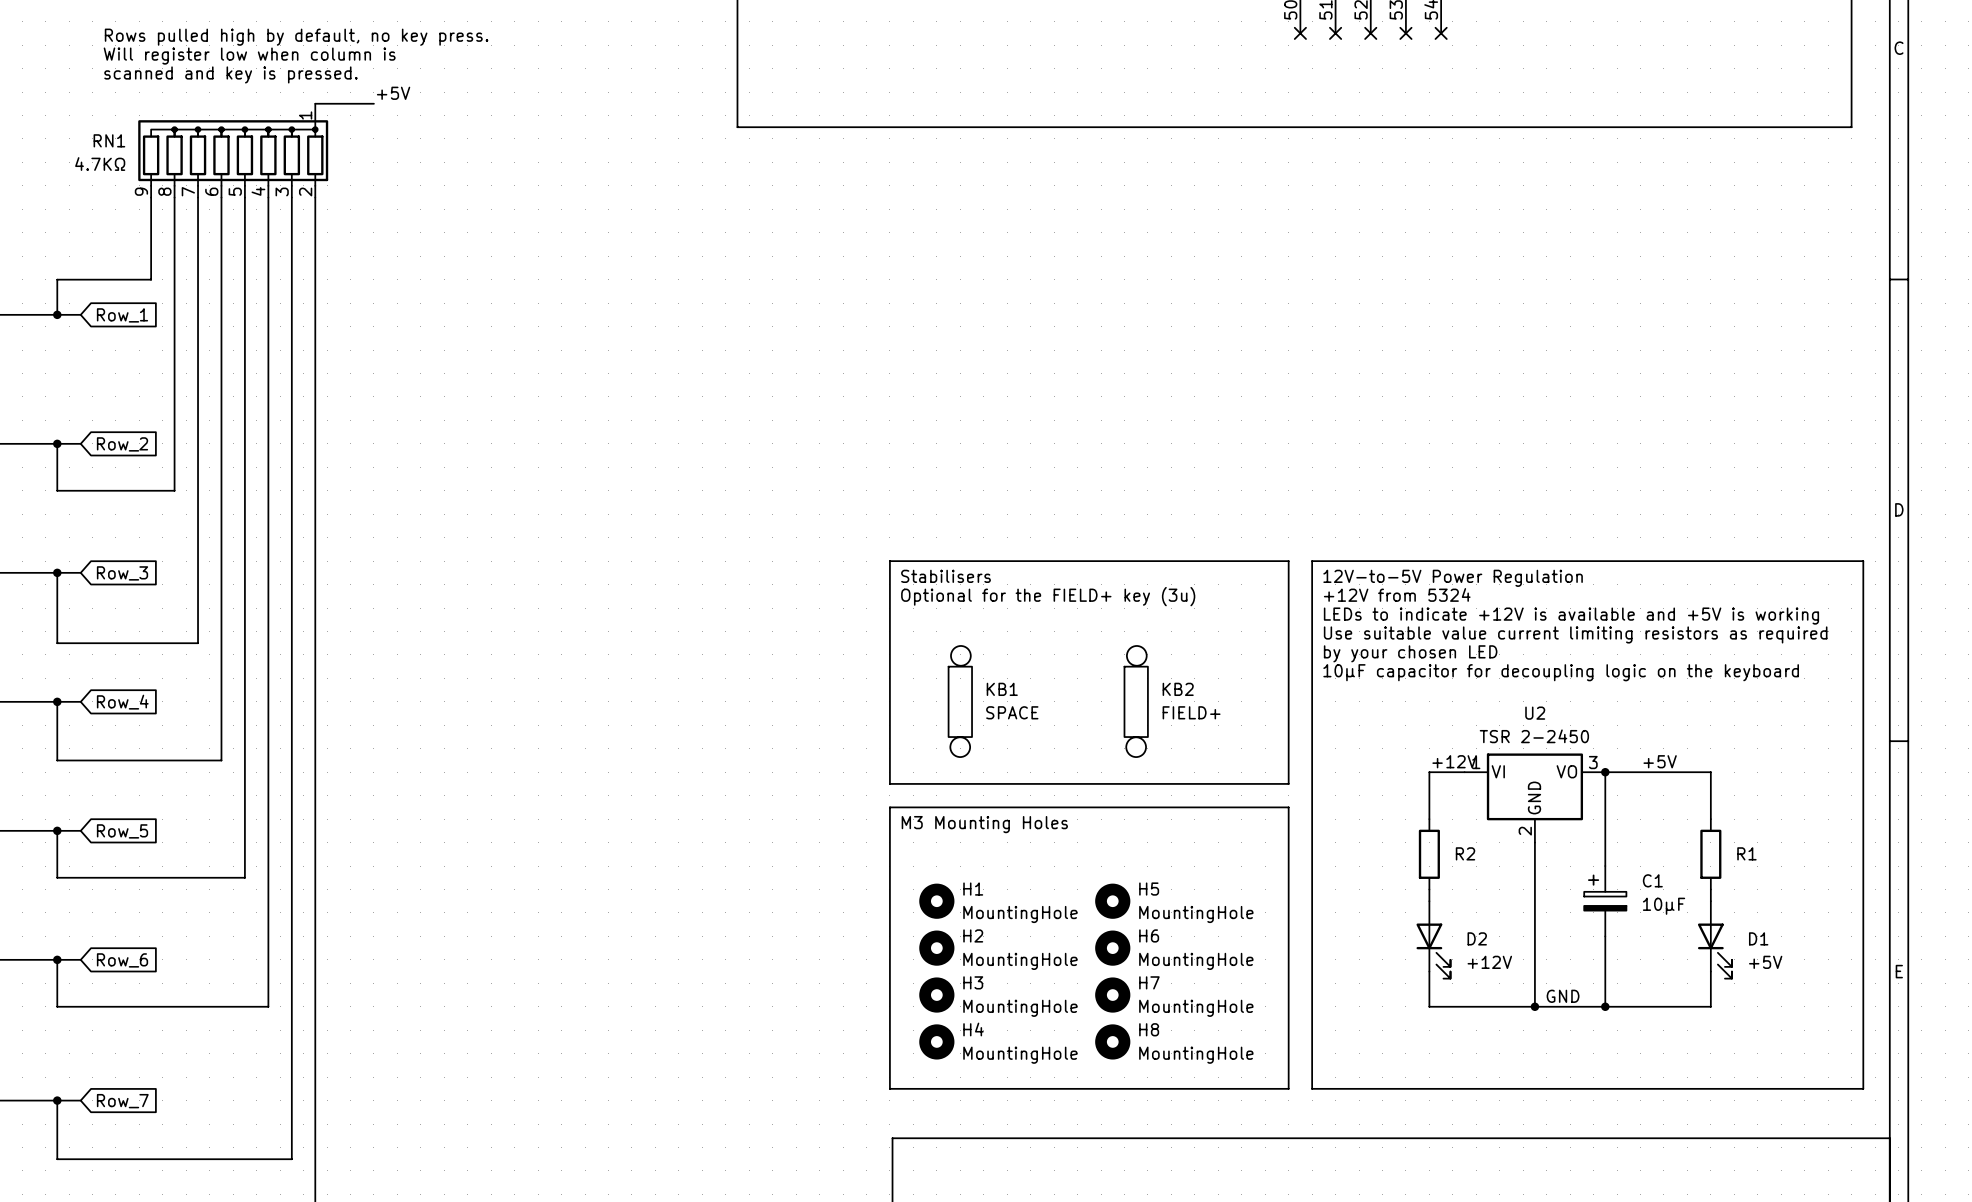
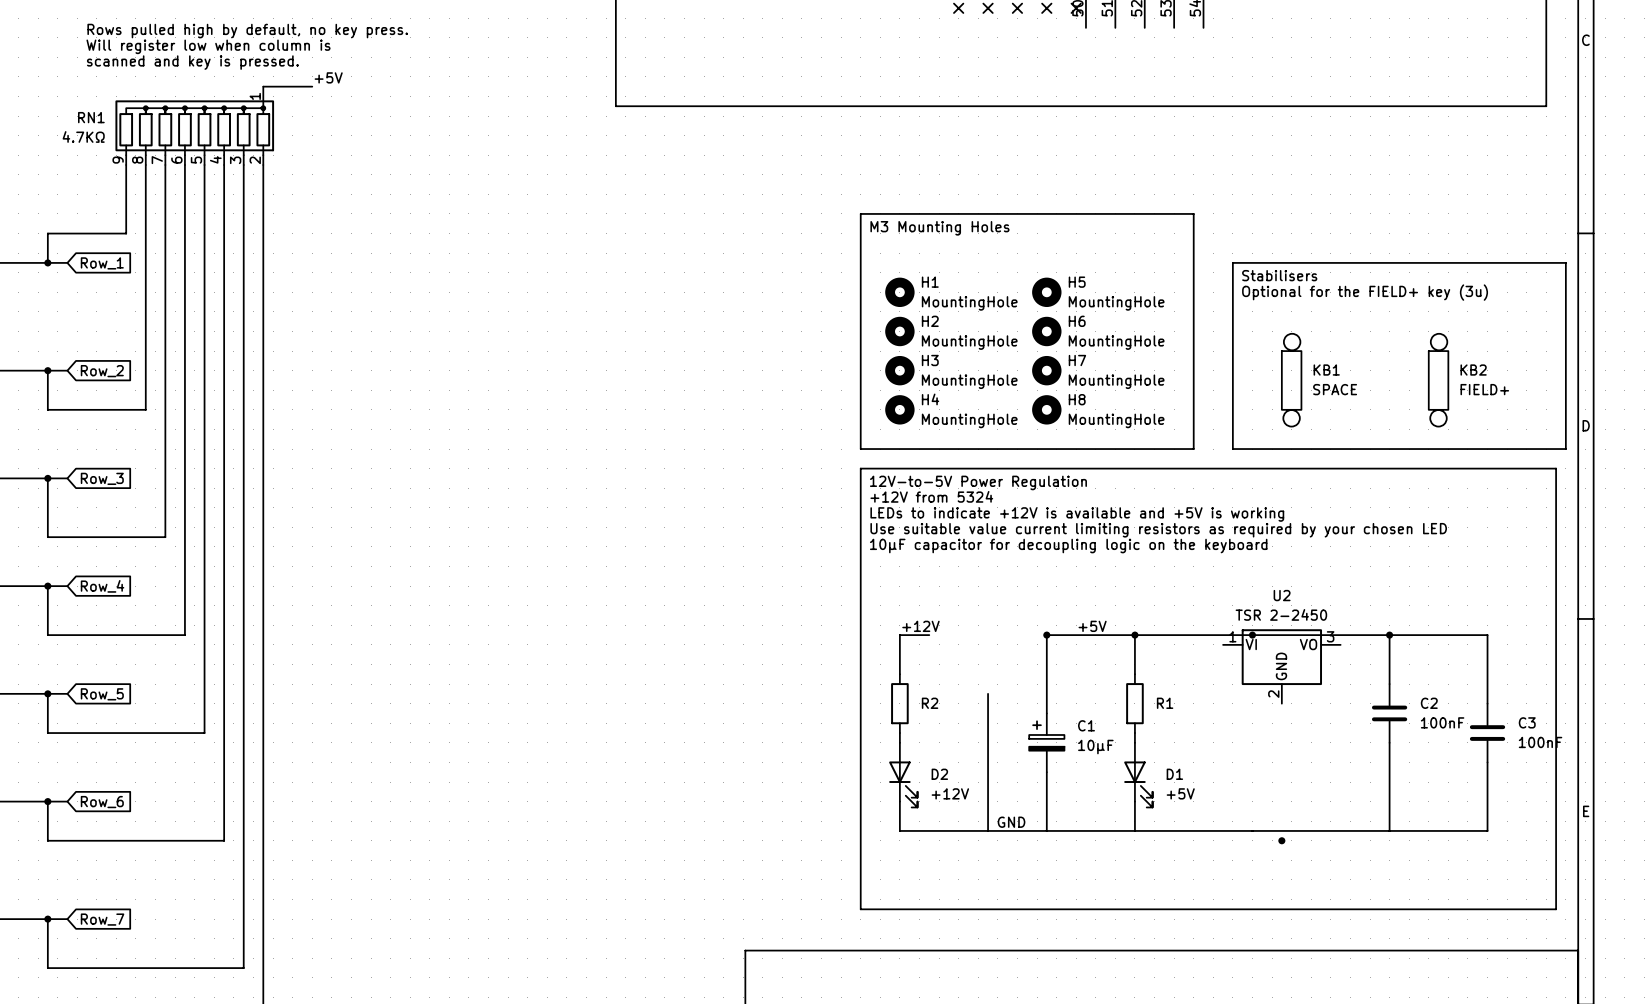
no-connect mark: none -> (958, 8)
no-connect mark: none -> (988, 8)
no-connect mark: none -> (1017, 8)
no-connect mark: none -> (1046, 8)
no-connect mark: none -> (1076, 8)
no-connect mark: (1300, 33) -> none
no-connect mark: (1335, 33) -> none
no-connect mark: (1370, 33) -> none
no-connect mark: (1405, 33) -> none
no-connect mark: (1441, 33) -> none
line: none -> (860, 213) (1193, 213) (1193, 449) (860, 449) (860, 213)
text: none -> M3 Mounting Holes (939, 228)
line: none -> (1232, 262) (1565, 262) (1565, 449) (1232, 449) (1232, 262)
text: none -> Stabilisers (1279, 275)
text: none -> Optional for the FIELD+ key (3u) (1365, 292)
line: (1030, 561) (889, 561) (889, 783) (1288, 783) (1288, 561) -> (1095, 468) (1076, 468)
line: none -> (860, 468) (860, 909)
line: (1312, 561) (1312, 1088) -> none
text: Stabilisers (946, 576) -> none
text: none -> 12V-to-5V Power Regulation (978, 482)
text: 12V-to-5V Power Regulation (1453, 578) -> none
text: none -> +12V from 5324 (931, 496)
text: +12V from 5324 (1397, 594) -> none
text: Optional for the FIELD+ key (3u) (1048, 596) -> none
text: none -> LEDs to indicate +12V is available and +5V is working (1077, 514)
text: LEDs to indicate +12V is available and +5V is working (1571, 616) -> none
text: none -> Use suitable value current limiting resistors as required by your chosen LED (1158, 530)
text: Use suitable value current limiting resistors as required (1575, 634) -> none
text: none -> 10µF capacitor for decoupling logic on the keyboard (1068, 546)
text: by your chosen LED (1410, 653) -> none
text: 10µF capacitor for decoupling logic on the keyboard (1561, 672) -> none
KB1 position: (960, 701) -> (1291, 380)
KB2 position: (1136, 701) -> (1438, 380)
label: none -> +12V (920, 626)
label: none -> +5V (1092, 626)
wire: none -> (929, 635) (899, 635) (899, 674)
junction: none -> (1046, 635)
wire: none -> (1134, 635) (1134, 674)
junction: none -> (1134, 635)
junction: none -> (1252, 635)
wire: none -> (1389, 635) (1389, 684)
junction: none -> (1389, 635)
label: +12V (1454, 761) -> none
label: +5V (1660, 761) -> none
wire: (1464, 772) (1429, 772) (1429, 819) -> none
junction: (1605, 772) -> none
wire: (1710, 819) (1710, 772) (1605, 772) (1605, 866) -> none
text: M3 Mounting Holes (984, 824) -> none
wire: none -> (988, 693) (988, 830)
wire: (1534, 842) (1534, 1006) -> none
wire: none -> (1487, 703) (1487, 635) (1046, 635) (1046, 713)
R2 position: (1429, 854) -> (899, 703)
C2: none -> 100nF (1389, 713)
R1 position: (1710, 854) -> (1134, 703)
wire: none -> (899, 733) (899, 742)
C3: none -> 100nF (1487, 733)
wire: (1429, 889) (1429, 901) -> (1134, 733) (1134, 742)
wire: none -> (1389, 742) (1389, 830)
wire: (1710, 889) (1710, 901) -> none
H1 position: (936, 901) -> (899, 292)
H5 position: (1112, 901) -> (1046, 292)
C1 position: (1605, 901) -> (1046, 742)
wire: none -> (1487, 762) (1487, 830) (899, 830) (899, 801)
wire: none -> (1046, 772) (1046, 830)
wire: (1605, 936) (1605, 1006) -> none
D2 position: (1433, 939) -> (903, 775)
D1 position: (1714, 939) -> (1138, 775)
H2 position: (936, 948) -> (899, 331)
H6 position: (1112, 948) -> (1046, 331)
wire: none -> (1134, 801) (1134, 830)
wire: (1429, 971) (1429, 1006) (1710, 1006) (1710, 971) -> none
label: none -> GND (1011, 822)
H3 position: (936, 995) -> (899, 370)
H7 position: (1112, 995) -> (1046, 370)
label: GND (1563, 996) -> none
junction: (1605, 1006) -> none
H4 position: (936, 1041) -> (899, 409)
H8 position: (1112, 1041) -> (1046, 409)
line: (1030, 1088) (889, 1088) (889, 807) (1288, 807) (1288, 1088) -> (1095, 909) (1076, 909)

